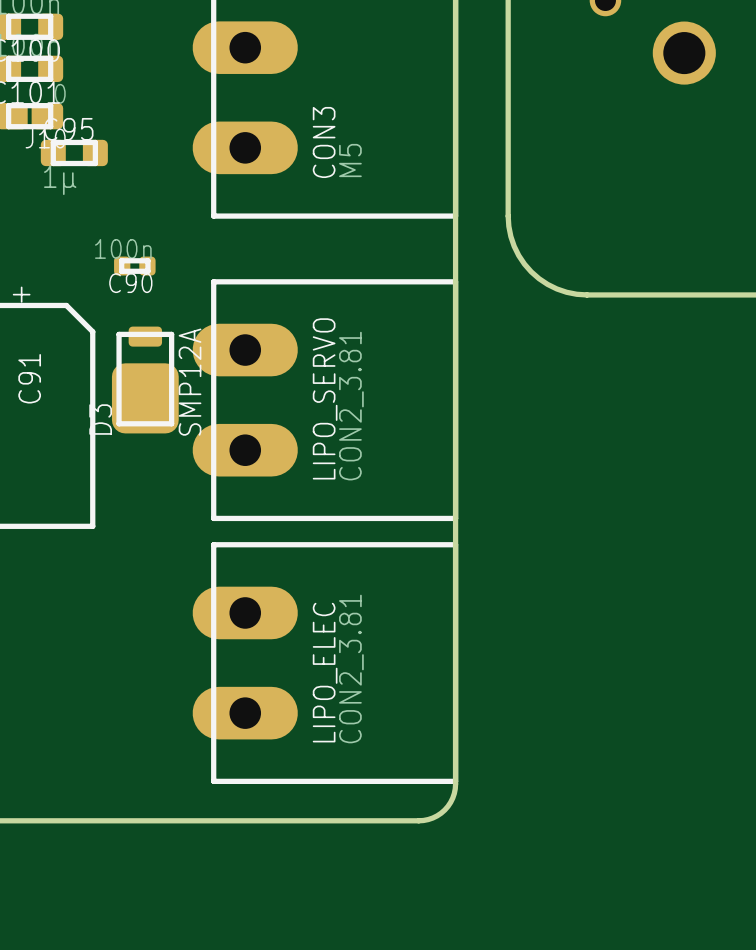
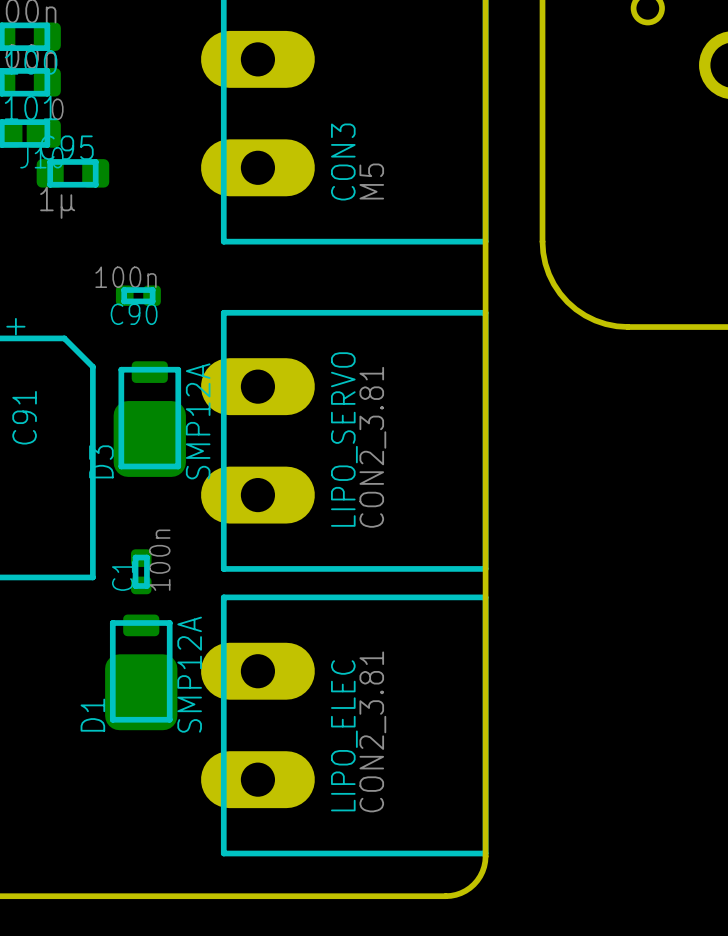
C1: none -> 100n (141, 571)
D1: none -> SMP12A (141, 672)

